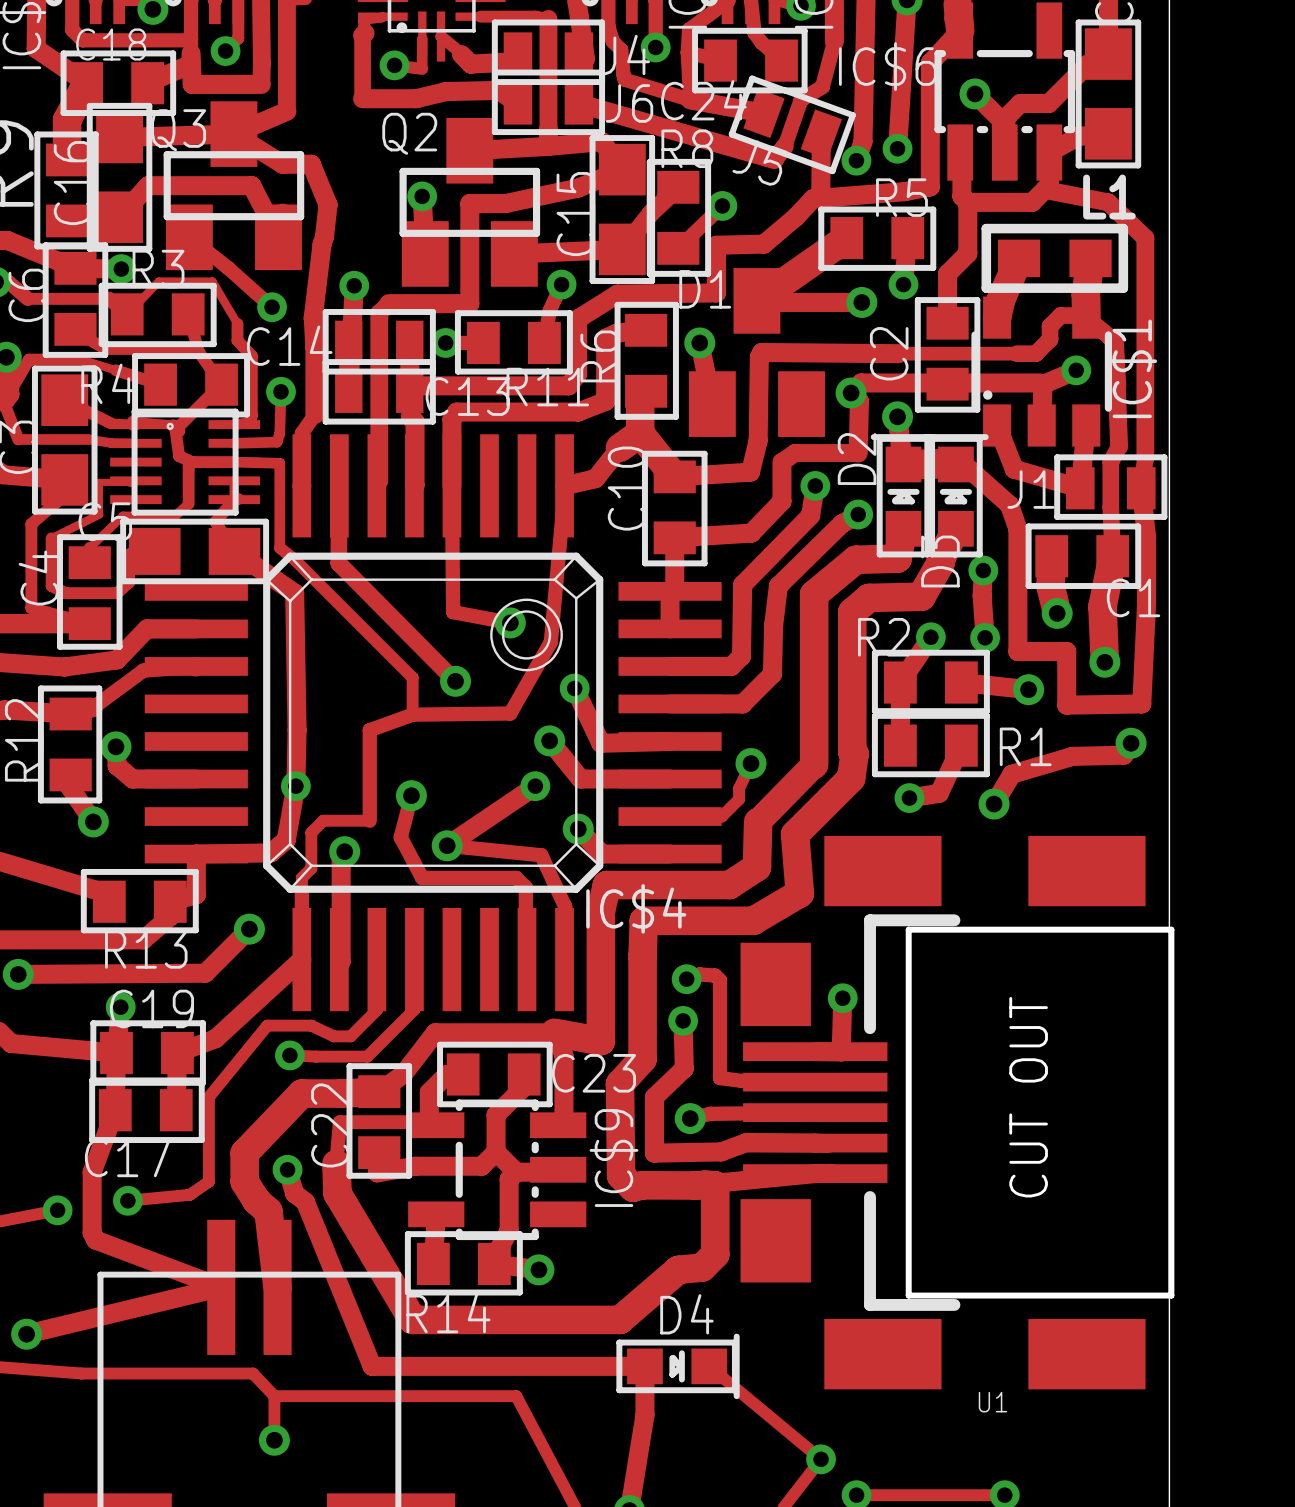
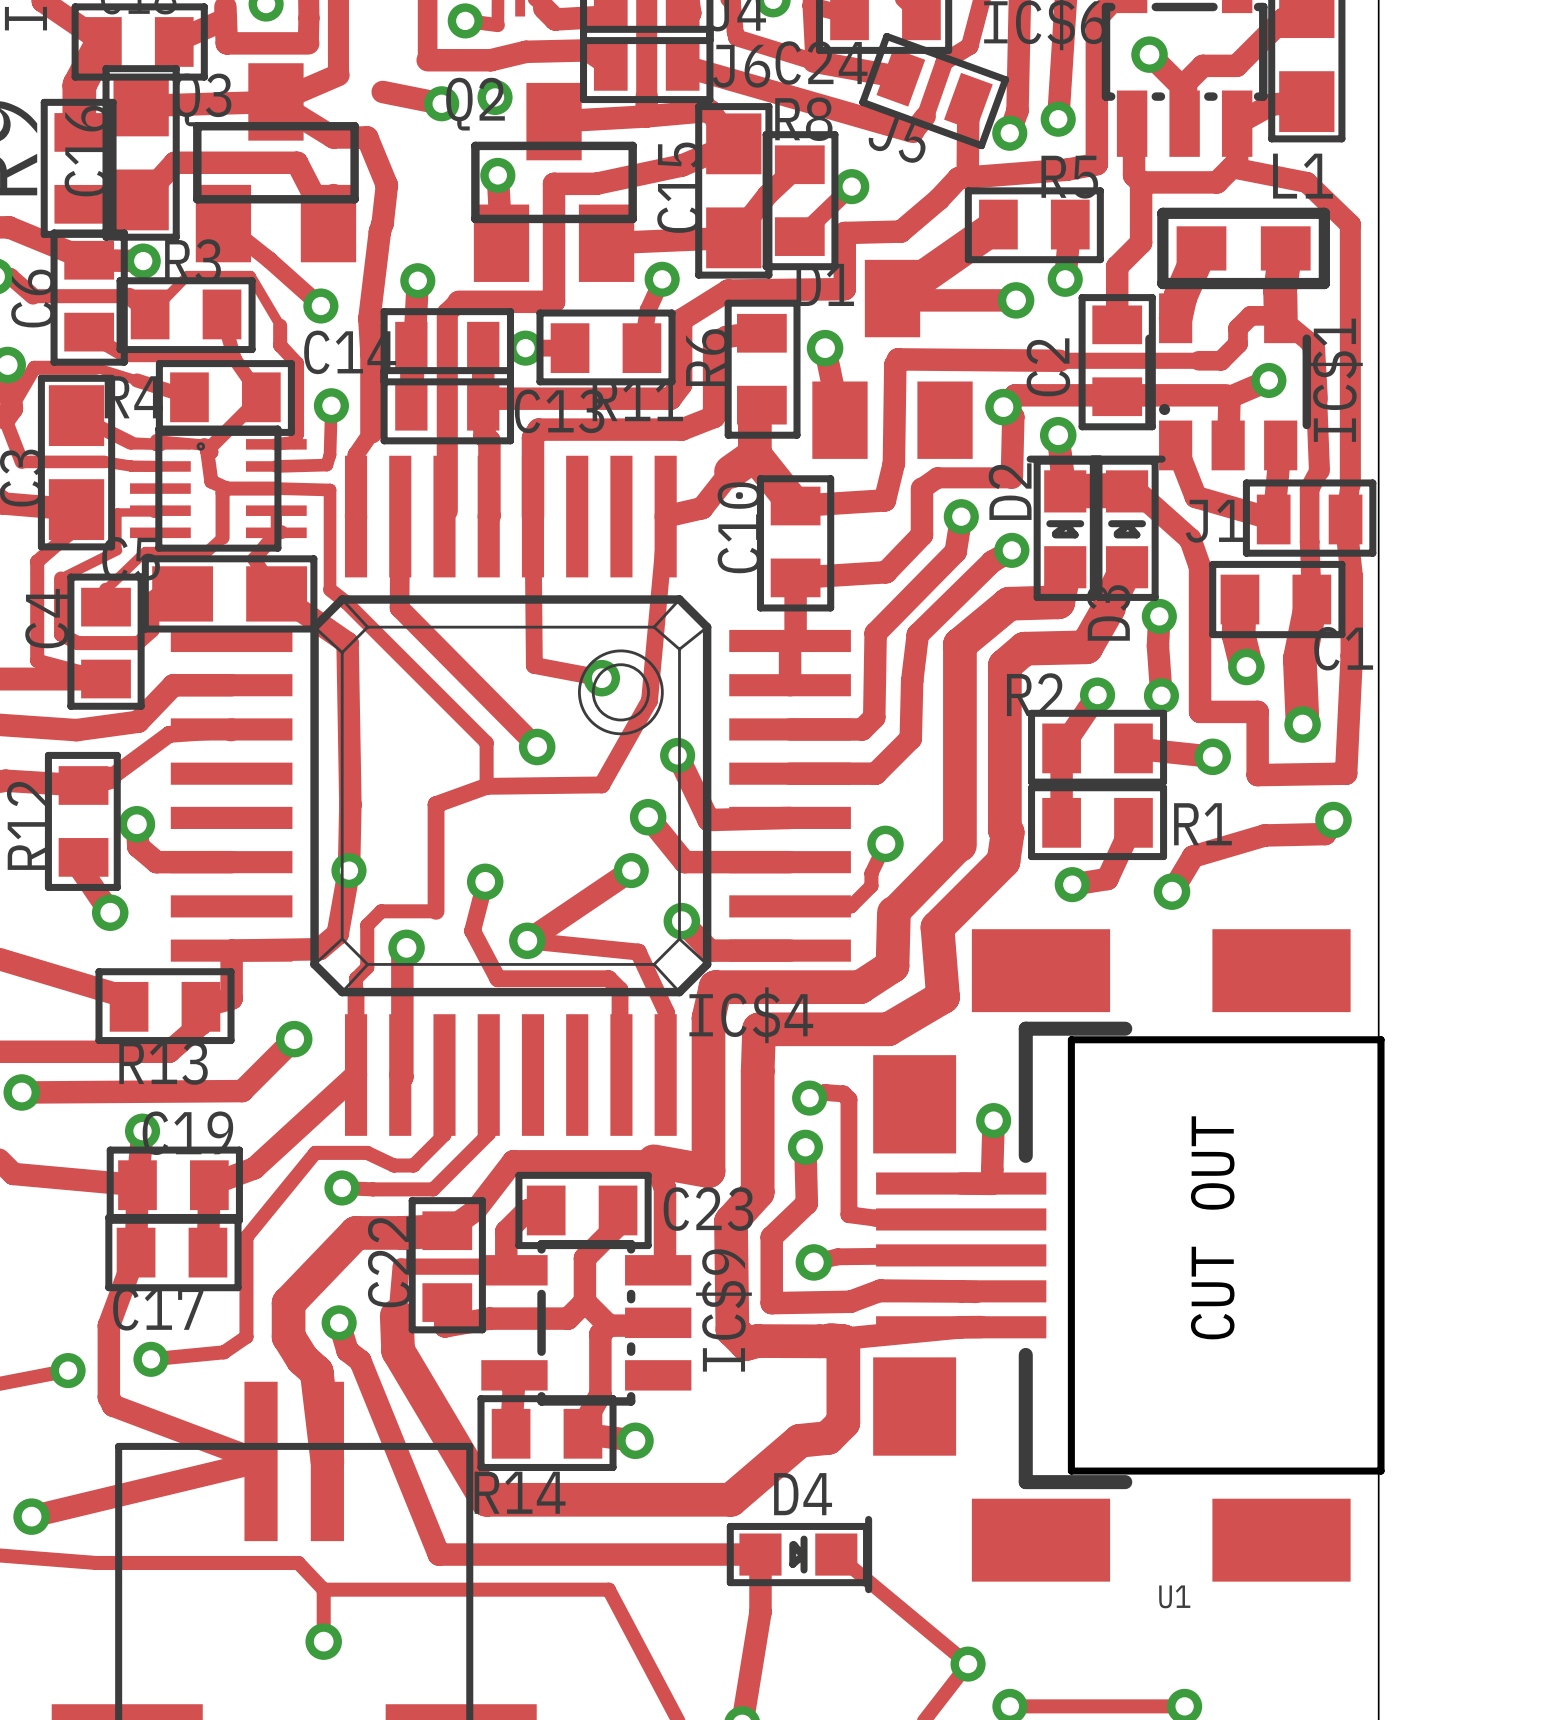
track: none -> (382, 91) (441, 103)
via: none -> (495, 97)
via: none -> (441, 103)

